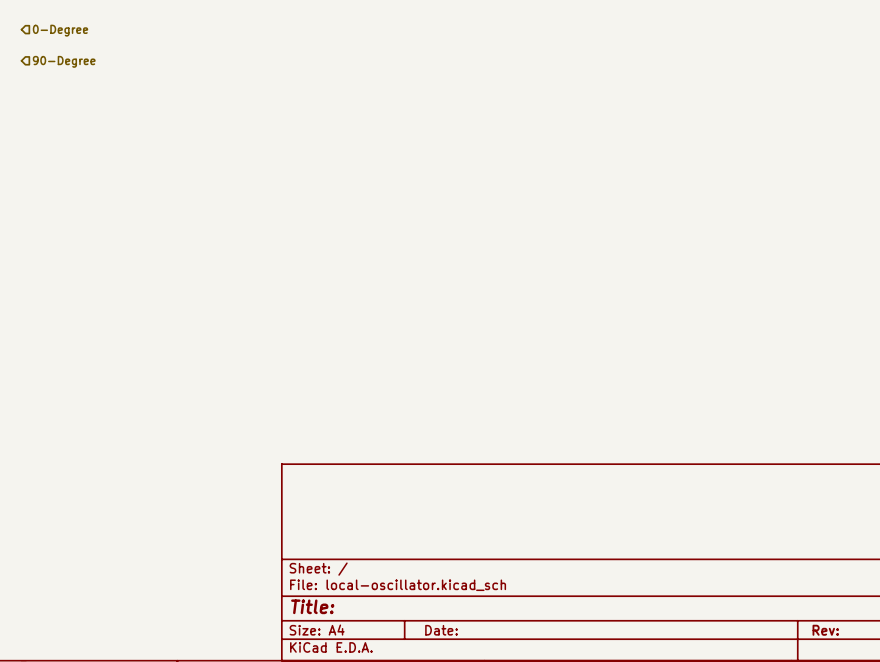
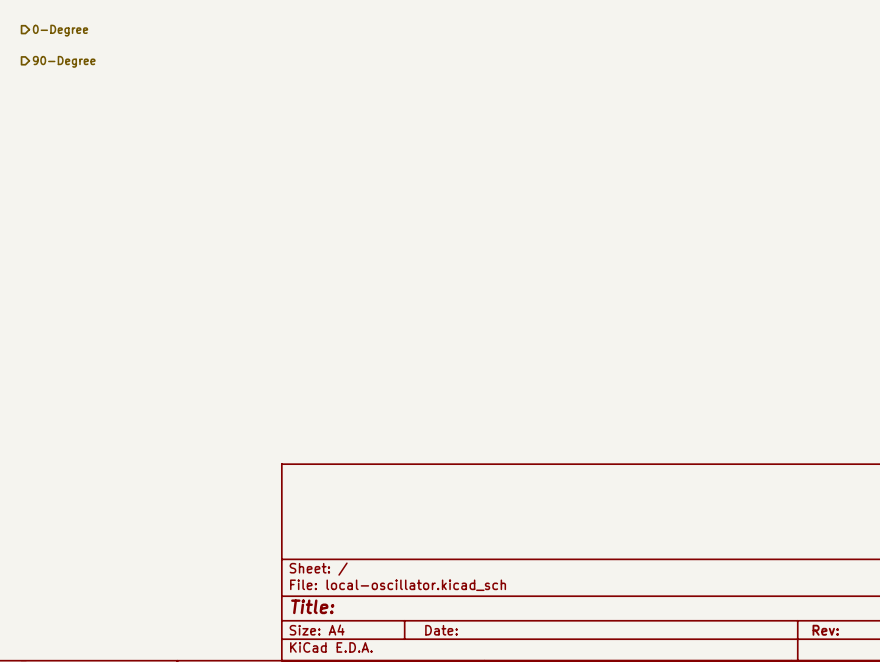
hierarchical label shape: input (60, 30) -> output (60, 30)
hierarchical label shape: input (64, 61) -> output (64, 61)

